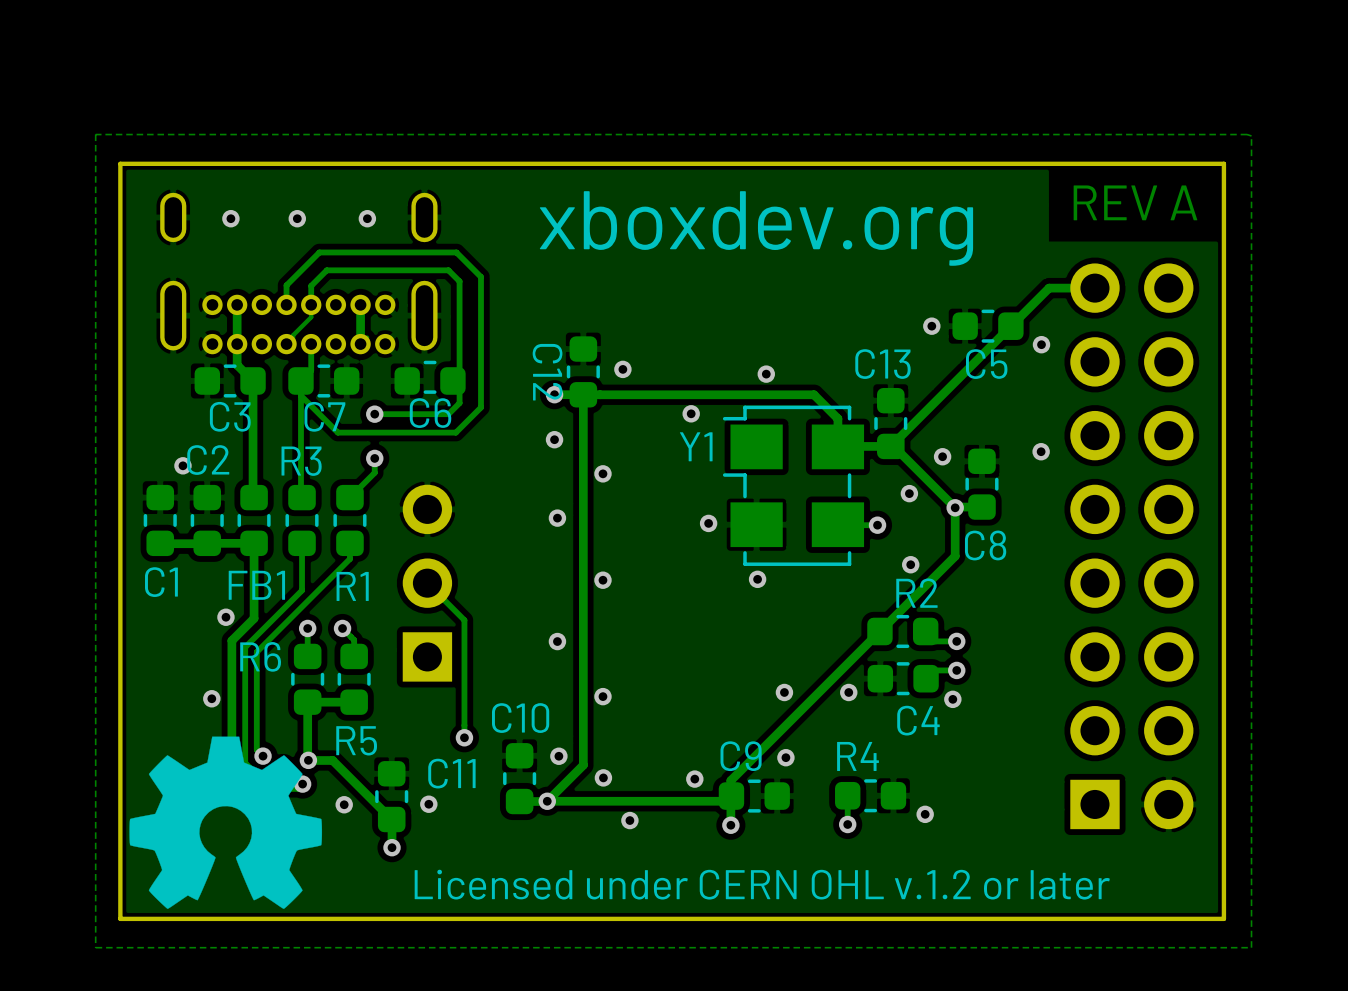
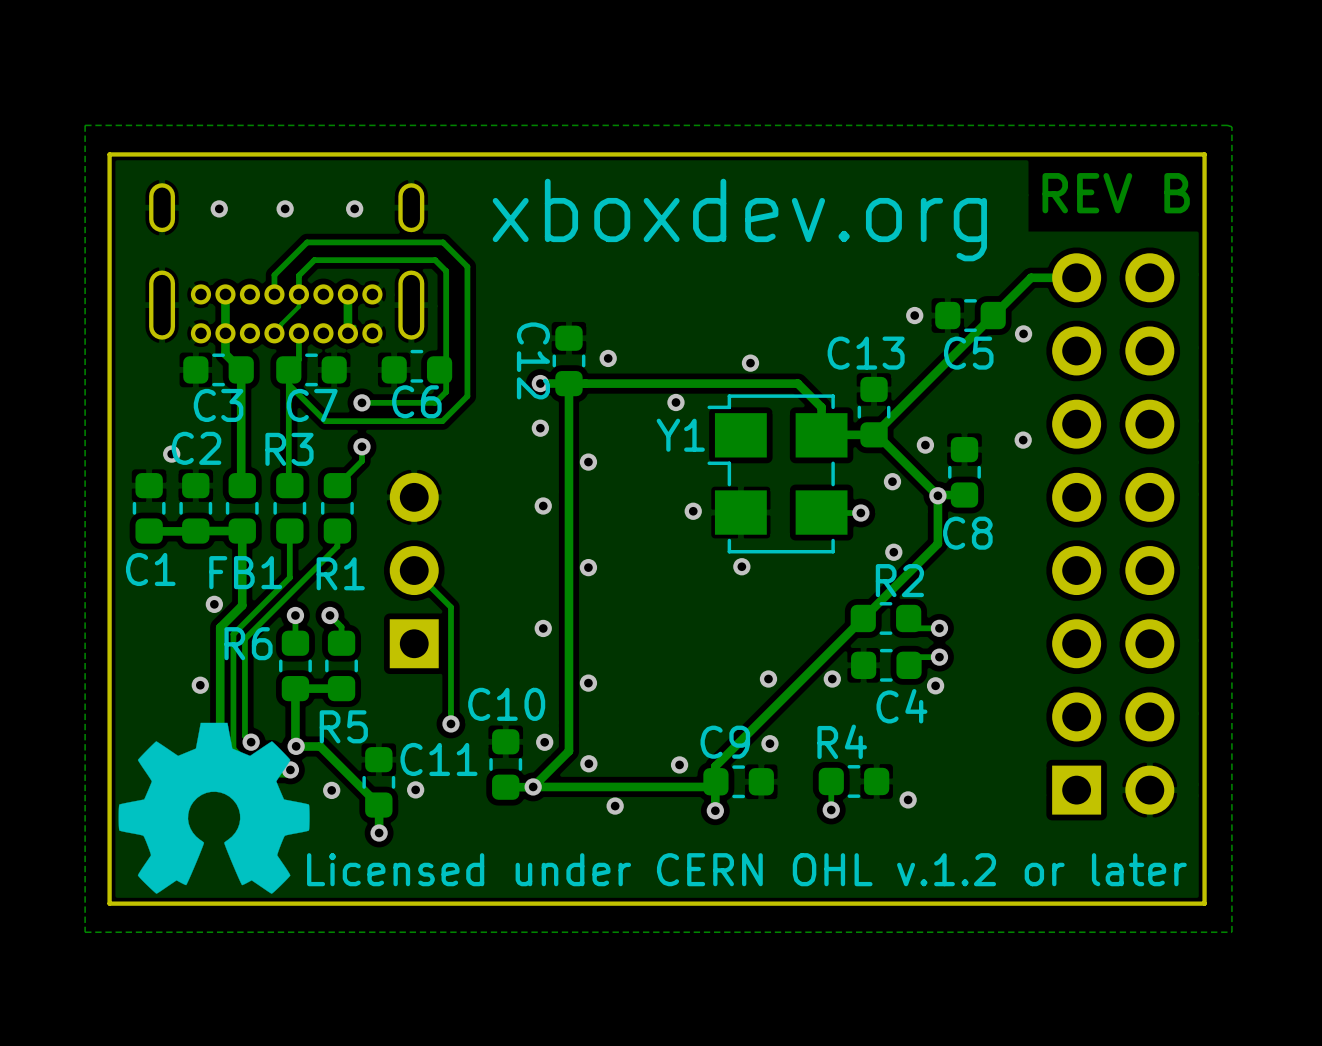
text: REV A (1135, 202) -> REV B (1116, 193)

